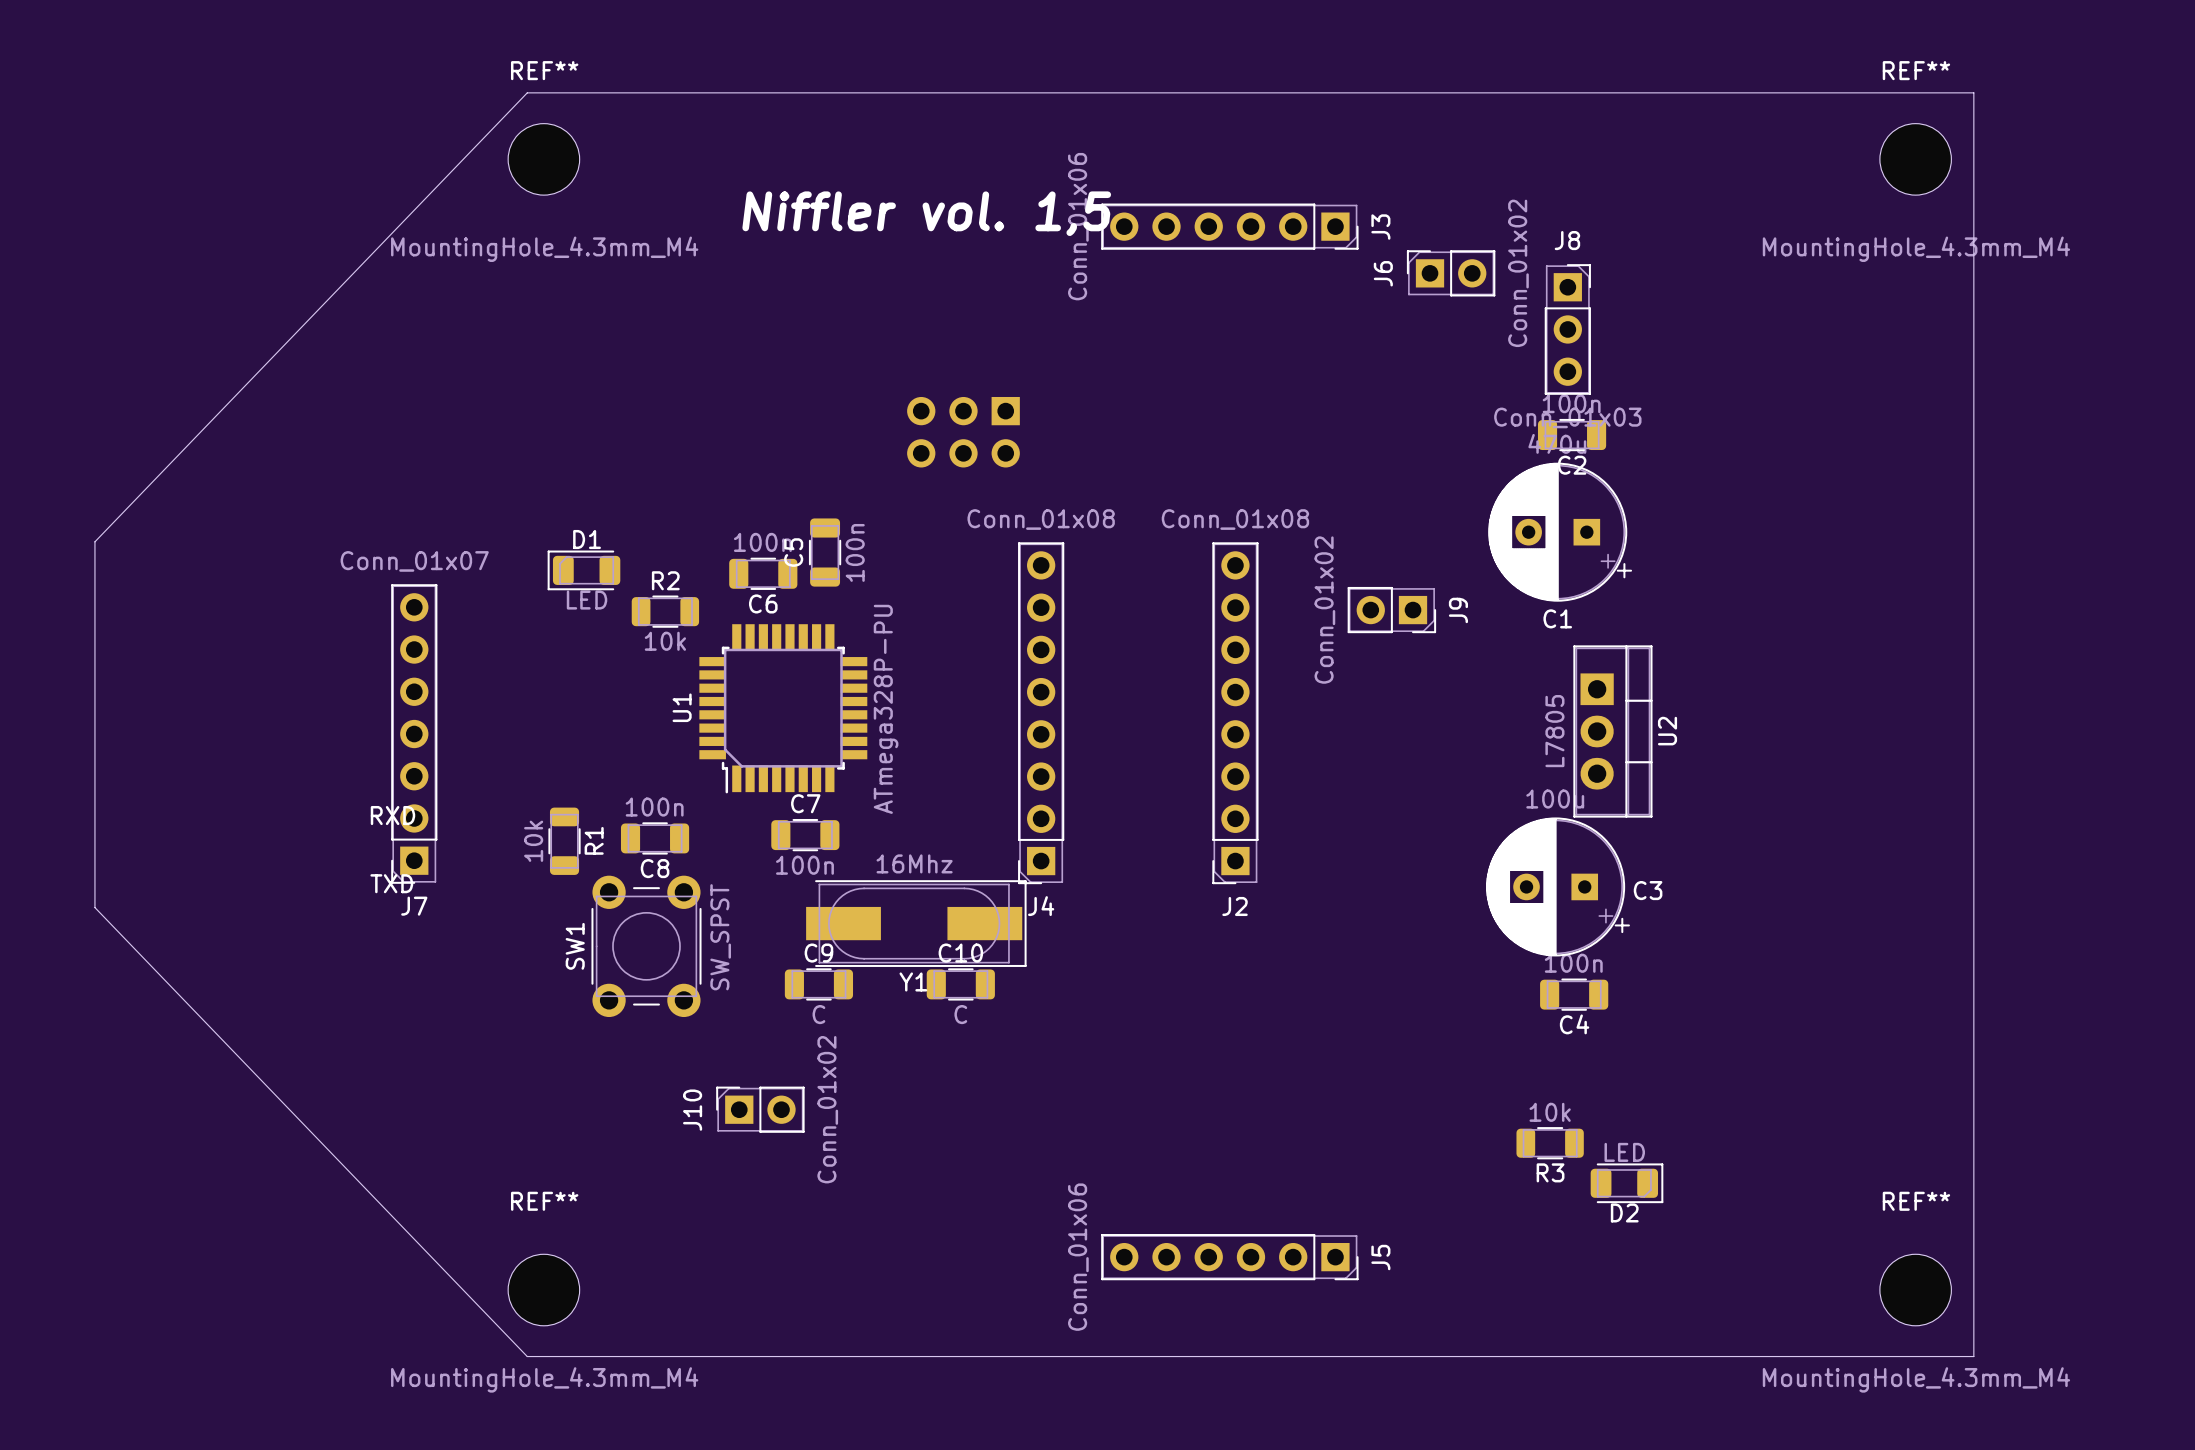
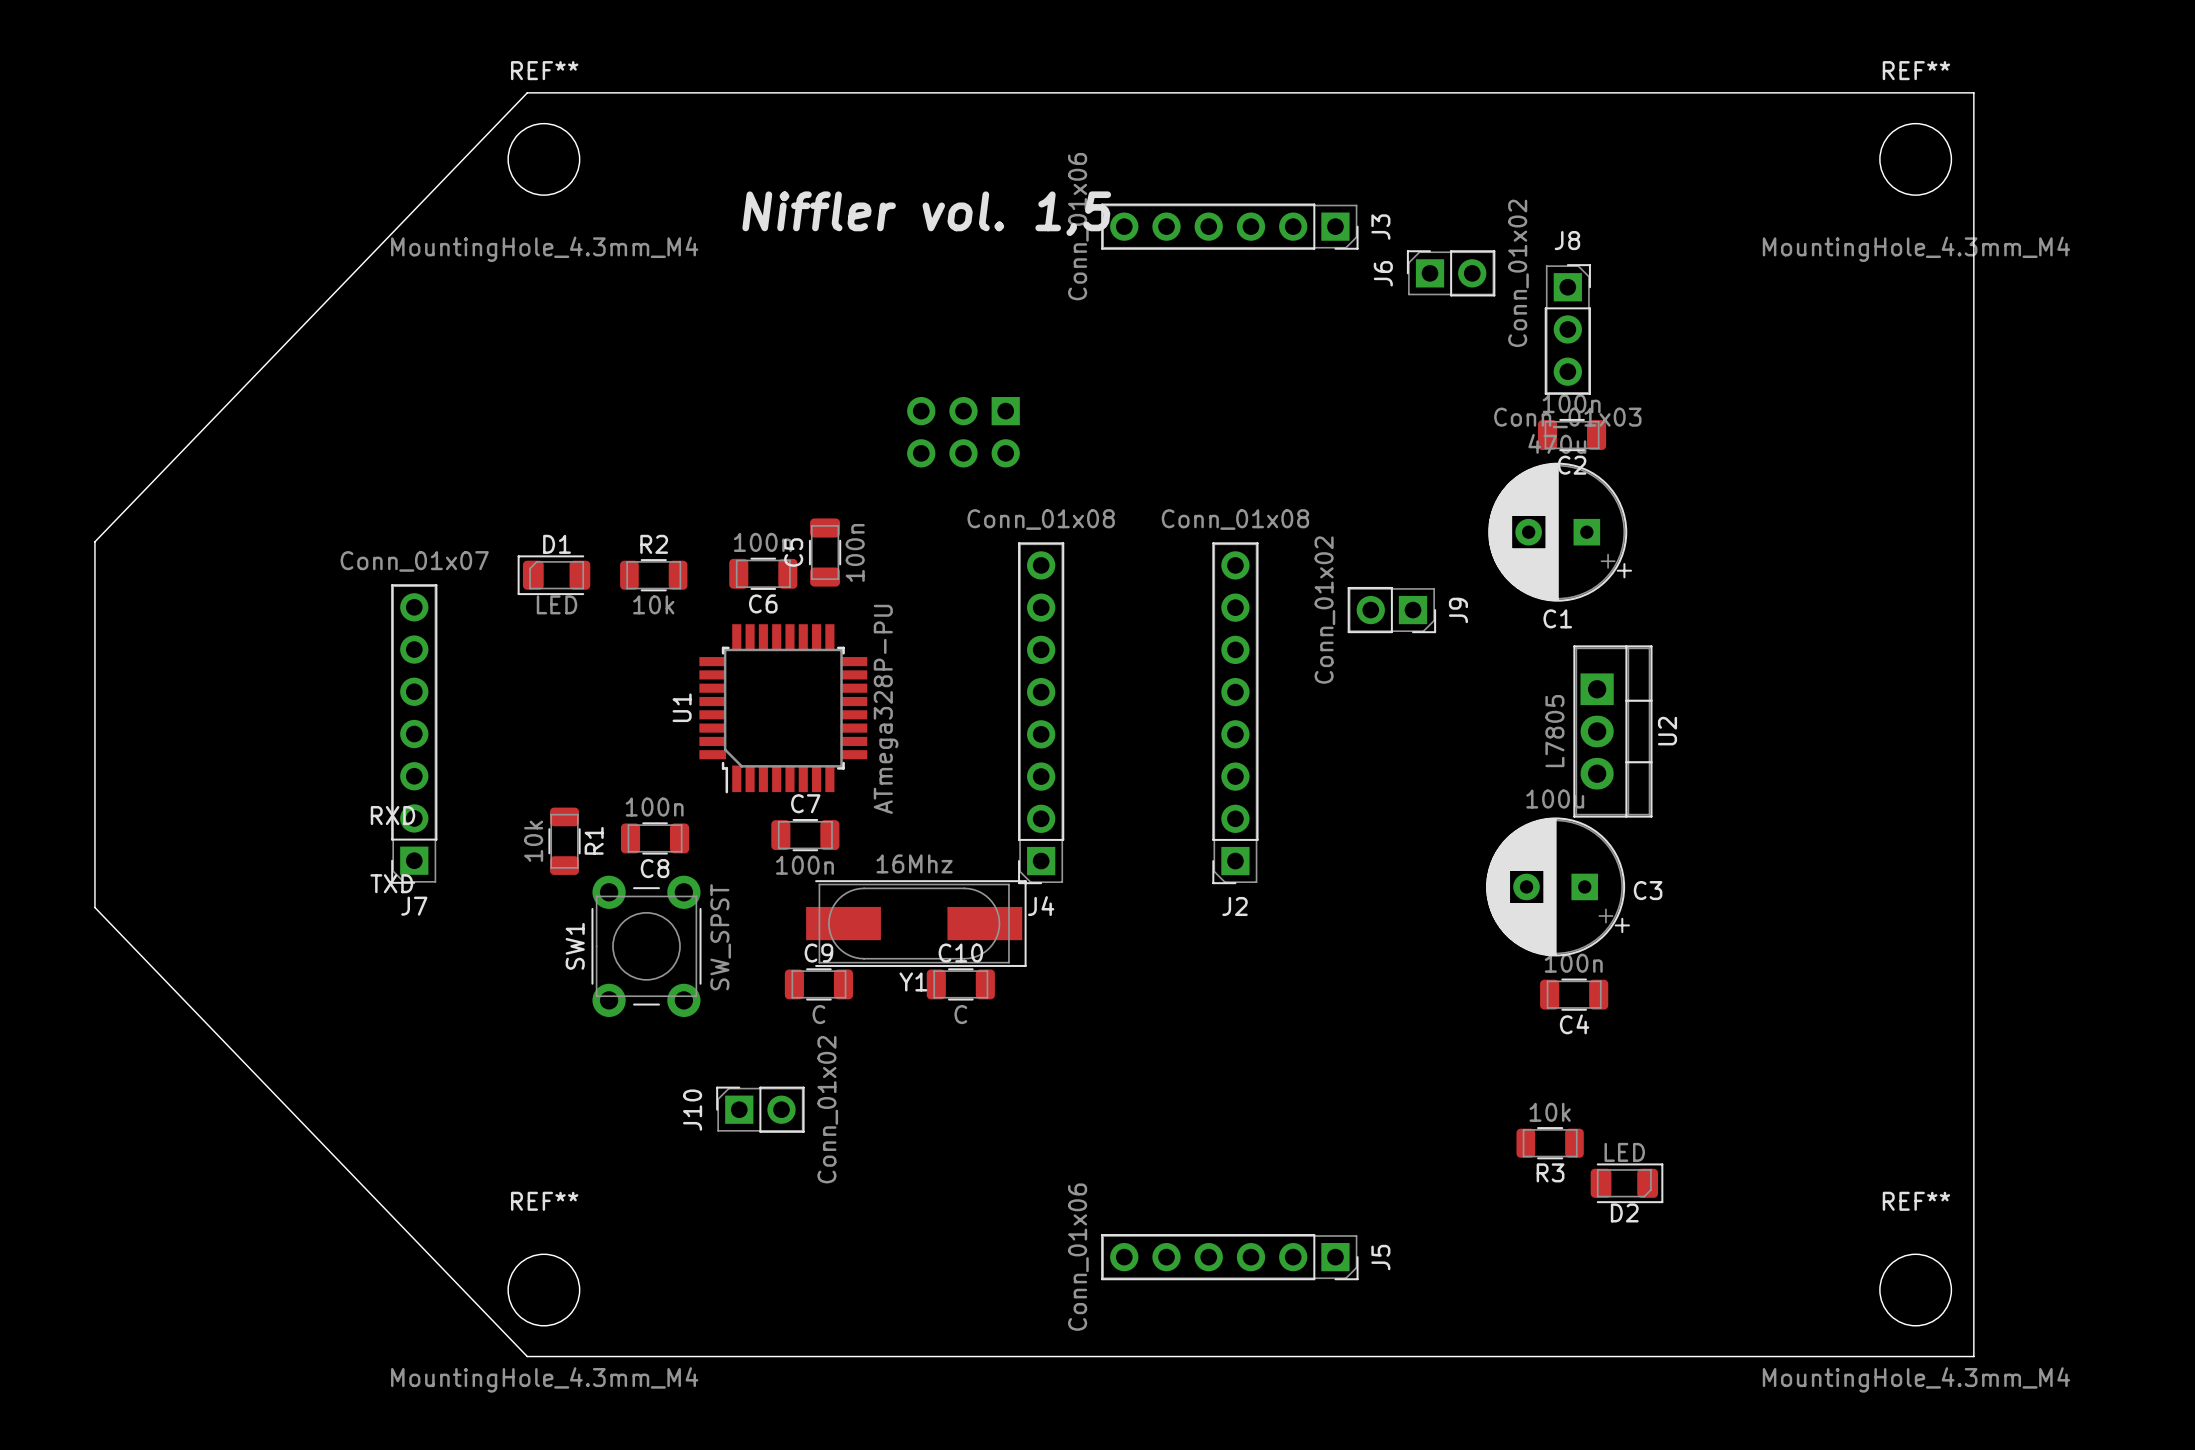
D1 position: (583, 570) -> (553, 575)
R2 position: (665, 611) -> (653, 575)

